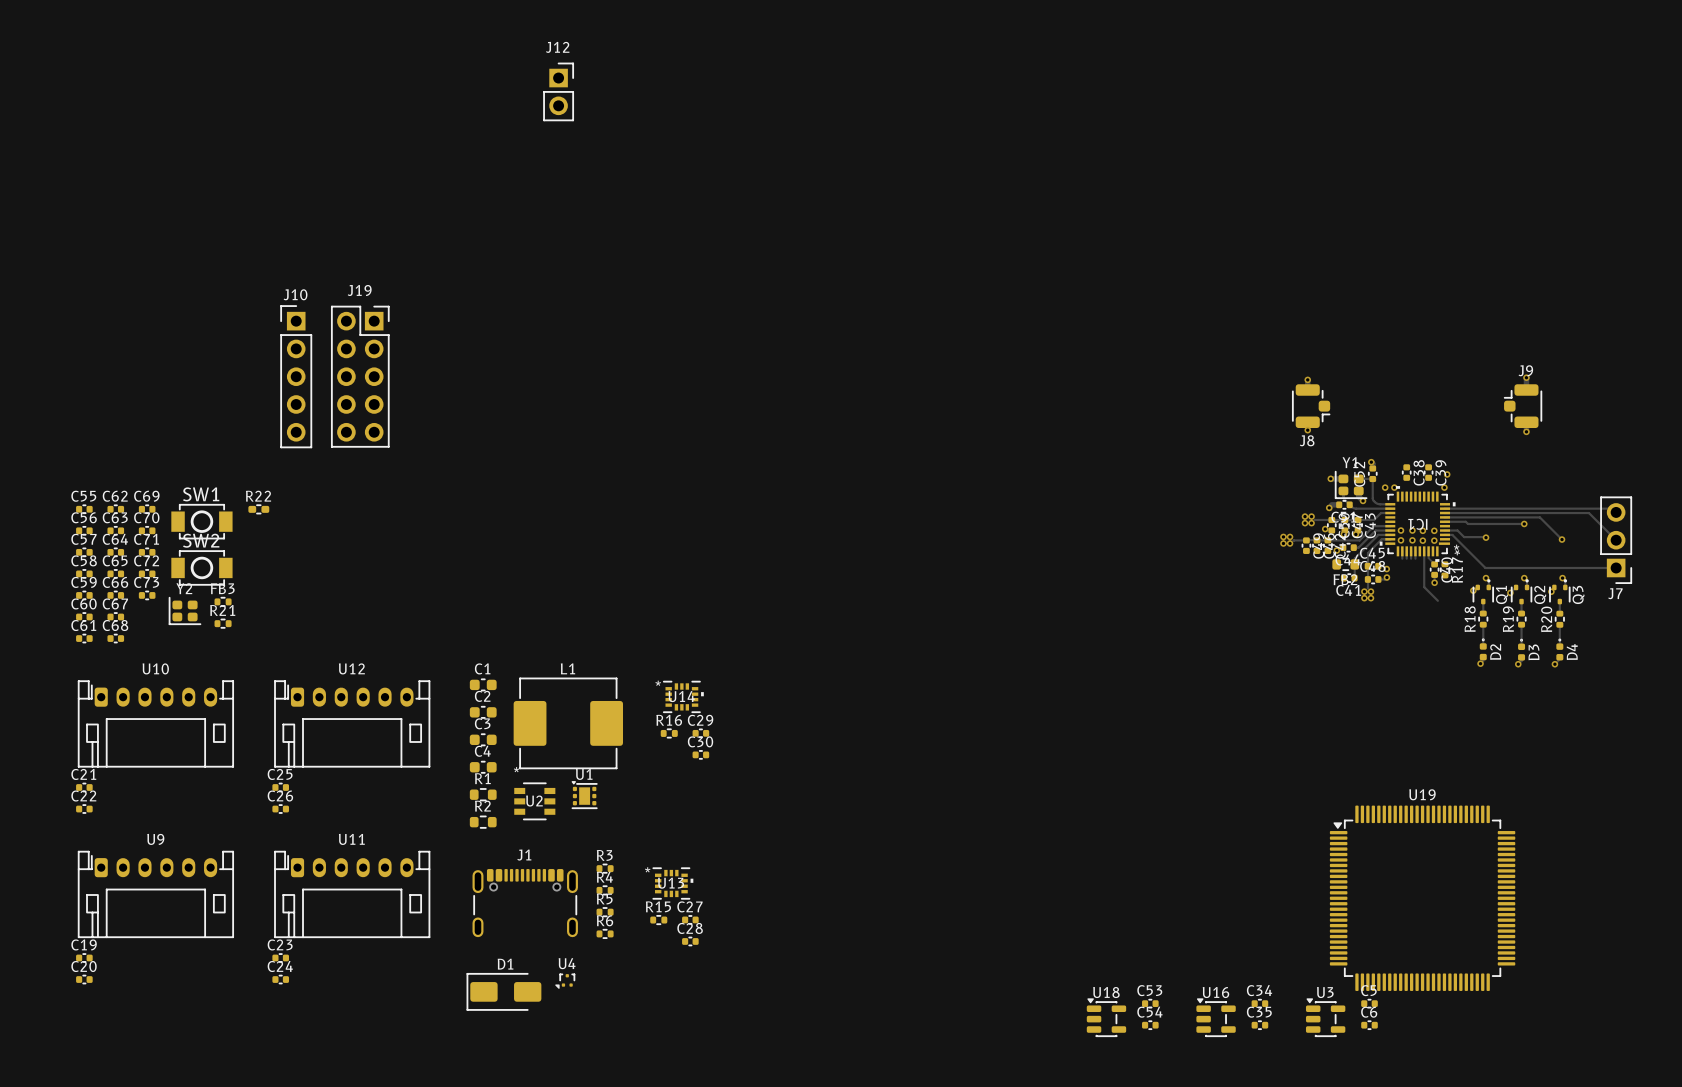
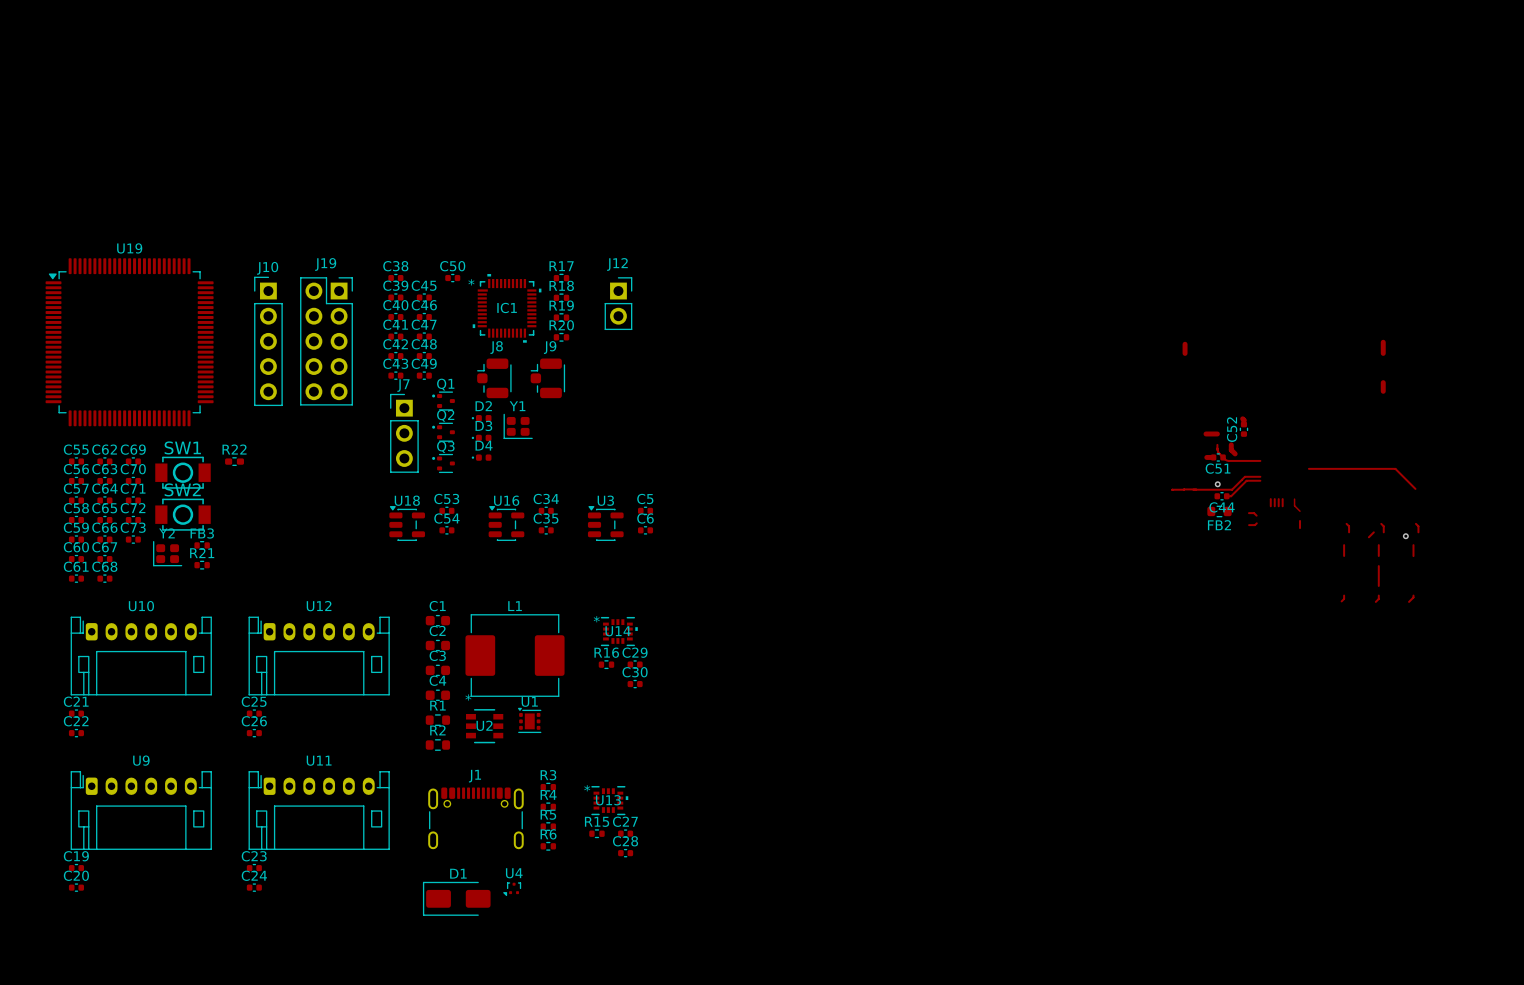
J12 position: (558, 91) -> (618, 303)
via: (1526, 377) -> none
via: (1307, 379) -> none
J8 rotation: 0° (1311, 406) -> 180° (494, 378)
J8 position: (1311, 406) -> (494, 378)
J9 position: (1523, 406) -> (547, 378)
via: (1307, 430) -> none
via: (1526, 431) -> none
via: (1371, 462) -> none
C38 rotation: 0° (1406, 472) -> 90° clockwise (395, 278)
C38 position: (1406, 472) -> (395, 278)
C39 rotation: 0° (1428, 472) -> 90° clockwise (395, 297)
C39 position: (1428, 472) -> (395, 297)
via: (1447, 474) -> none
via: (1330, 478) -> none
track: (1358, 478) (1372, 478) (1373, 500) (1378, 504) (1390, 504) -> none
Y1 position: (1351, 484) -> (518, 426)
via: (1385, 487) -> none
via: (1394, 487) -> none
via: (1444, 487) -> none
via: (1363, 500) -> none
via: (1329, 507) -> none
track: (1444, 508) (1612, 508) (1616, 512) -> none
track: (1390, 513) (1381, 513) (1374, 519) (1314, 519) -> none
track: (1444, 513) (1588, 513) (1616, 540) -> none
via: (1305, 516) -> none
via: (1311, 516) -> none
track: (1444, 521) (1465, 521) (1467, 523) (1524, 523) -> none
via: (1305, 523) -> none
via: (1311, 523) -> none
IC1 rotation: 0° (1417, 523) -> 180° (507, 308)
IC1 position: (1417, 523) -> (507, 308)
via: (1524, 523) -> none
C50 rotation: 0° (1331, 525) -> 90° clockwise (452, 278)
C50 position: (1331, 525) -> (452, 278)
C47 rotation: 0° (1344, 525) -> 90° clockwise (424, 336)
C47 position: (1344, 525) -> (424, 336)
C43 rotation: 0° (1358, 525) -> 90° clockwise (395, 375)
C43 position: (1358, 525) -> (395, 375)
via: (1325, 529) -> none
via: (1400, 530) -> none
via: (1412, 530) -> none
via: (1422, 530) -> none
via: (1434, 530) -> none
track: (1444, 530) (1457, 530) (1464, 537) (1486, 537) -> none
via: (1355, 534) -> none
track: (1390, 534) (1378, 534) (1354, 558) (1354, 578) -> none
track: (1444, 534) (1452, 534) (1485, 567) (1616, 567) -> none
via: (1283, 536) -> none
via: (1290, 536) -> none
via: (1486, 537) -> none
track: (1390, 539) (1381, 539) (1368, 553) (1367, 588) -> none
via: (1562, 539) -> none
via: (1400, 540) -> none
via: (1412, 540) -> none
via: (1422, 540) -> none
via: (1434, 540) -> none
J7 rotation: 0° (1616, 540) -> 180° (404, 433)
J7 position: (1616, 540) -> (404, 433)
via: (1283, 543) -> none
via: (1290, 543) -> none
C49 rotation: 0° (1306, 545) -> 90° clockwise (424, 375)
C49 position: (1306, 545) -> (424, 375)
C46 rotation: 0° (1316, 545) -> 90° clockwise (424, 317)
C46 position: (1316, 545) -> (424, 317)
C42 rotation: 0° (1327, 545) -> 90° clockwise (395, 356)
C42 position: (1327, 545) -> (395, 356)
via: (1336, 550) -> none
track: (1424, 550) (1424, 587) (1437, 600) -> none
C45 position: (1373, 566) -> (424, 297)
via: (1386, 569) -> none
C40 rotation: 0° (1434, 569) -> 90° clockwise (395, 317)
C40 position: (1434, 569) -> (395, 317)
R17 rotation: 0° (1444, 569) -> 90° clockwise (561, 278)
R17 position: (1444, 569) -> (561, 278)
via: (1386, 577) -> none
C41 position: (1349, 578) -> (395, 336)
via: (1486, 578) -> none
via: (1524, 578) -> none
via: (1562, 578) -> none
C48 position: (1373, 579) -> (424, 356)
via: (1434, 582) -> none
C41 name position: C41 (1348, 590) -> C41 (395, 324)
via: (1473, 590) -> none
via: (1364, 591) -> none
via: (1370, 591) -> none
Q1 rotation: 0° (1483, 591) -> 90° counterclockwise (443, 401)
Q1 position: (1483, 591) -> (443, 401)
Q2 rotation: 0° (1521, 591) -> 90° counterclockwise (443, 432)
Q2 position: (1521, 591) -> (443, 432)
Q3 rotation: 0° (1559, 591) -> 90° counterclockwise (443, 463)
Q3 position: (1559, 591) -> (443, 463)
via: (1510, 592) -> none
via: (1364, 598) -> none
via: (1370, 598) -> none
R18 rotation: 0° (1483, 619) -> 90° clockwise (561, 297)
R18 position: (1483, 619) -> (561, 297)
R19 rotation: 0° (1521, 619) -> 90° clockwise (561, 317)
R19 position: (1521, 619) -> (561, 317)
R20 rotation: 0° (1559, 619) -> 90° clockwise (561, 337)
R20 position: (1559, 619) -> (561, 337)
track: (1483, 624) (1483, 646) -> none
track: (1559, 624) (1559, 646) -> none
D2 rotation: 0° (1483, 649) -> 90° counterclockwise (481, 418)
D2 position: (1483, 649) -> (481, 418)
D3 rotation: 0° (1521, 649) -> 90° counterclockwise (481, 437)
D3 position: (1521, 649) -> (481, 437)
D4 rotation: 0° (1559, 649) -> 90° counterclockwise (481, 457)
D4 position: (1559, 649) -> (481, 457)
via: (1480, 663) -> none
via: (1518, 664) -> none
via: (1554, 664) -> none
U19 position: (1422, 898) -> (129, 342)
C53 position: (1150, 1003) -> (446, 510)
C34 position: (1259, 1003) -> (546, 510)
C5 position: (1369, 1003) -> (645, 510)
U18 position: (1106, 1017) -> (407, 523)
U16 position: (1216, 1017) -> (506, 523)
U3 position: (1325, 1017) -> (605, 523)
C54 position: (1150, 1025) -> (446, 530)
C35 position: (1259, 1025) -> (546, 530)
C6 position: (1369, 1025) -> (645, 530)

